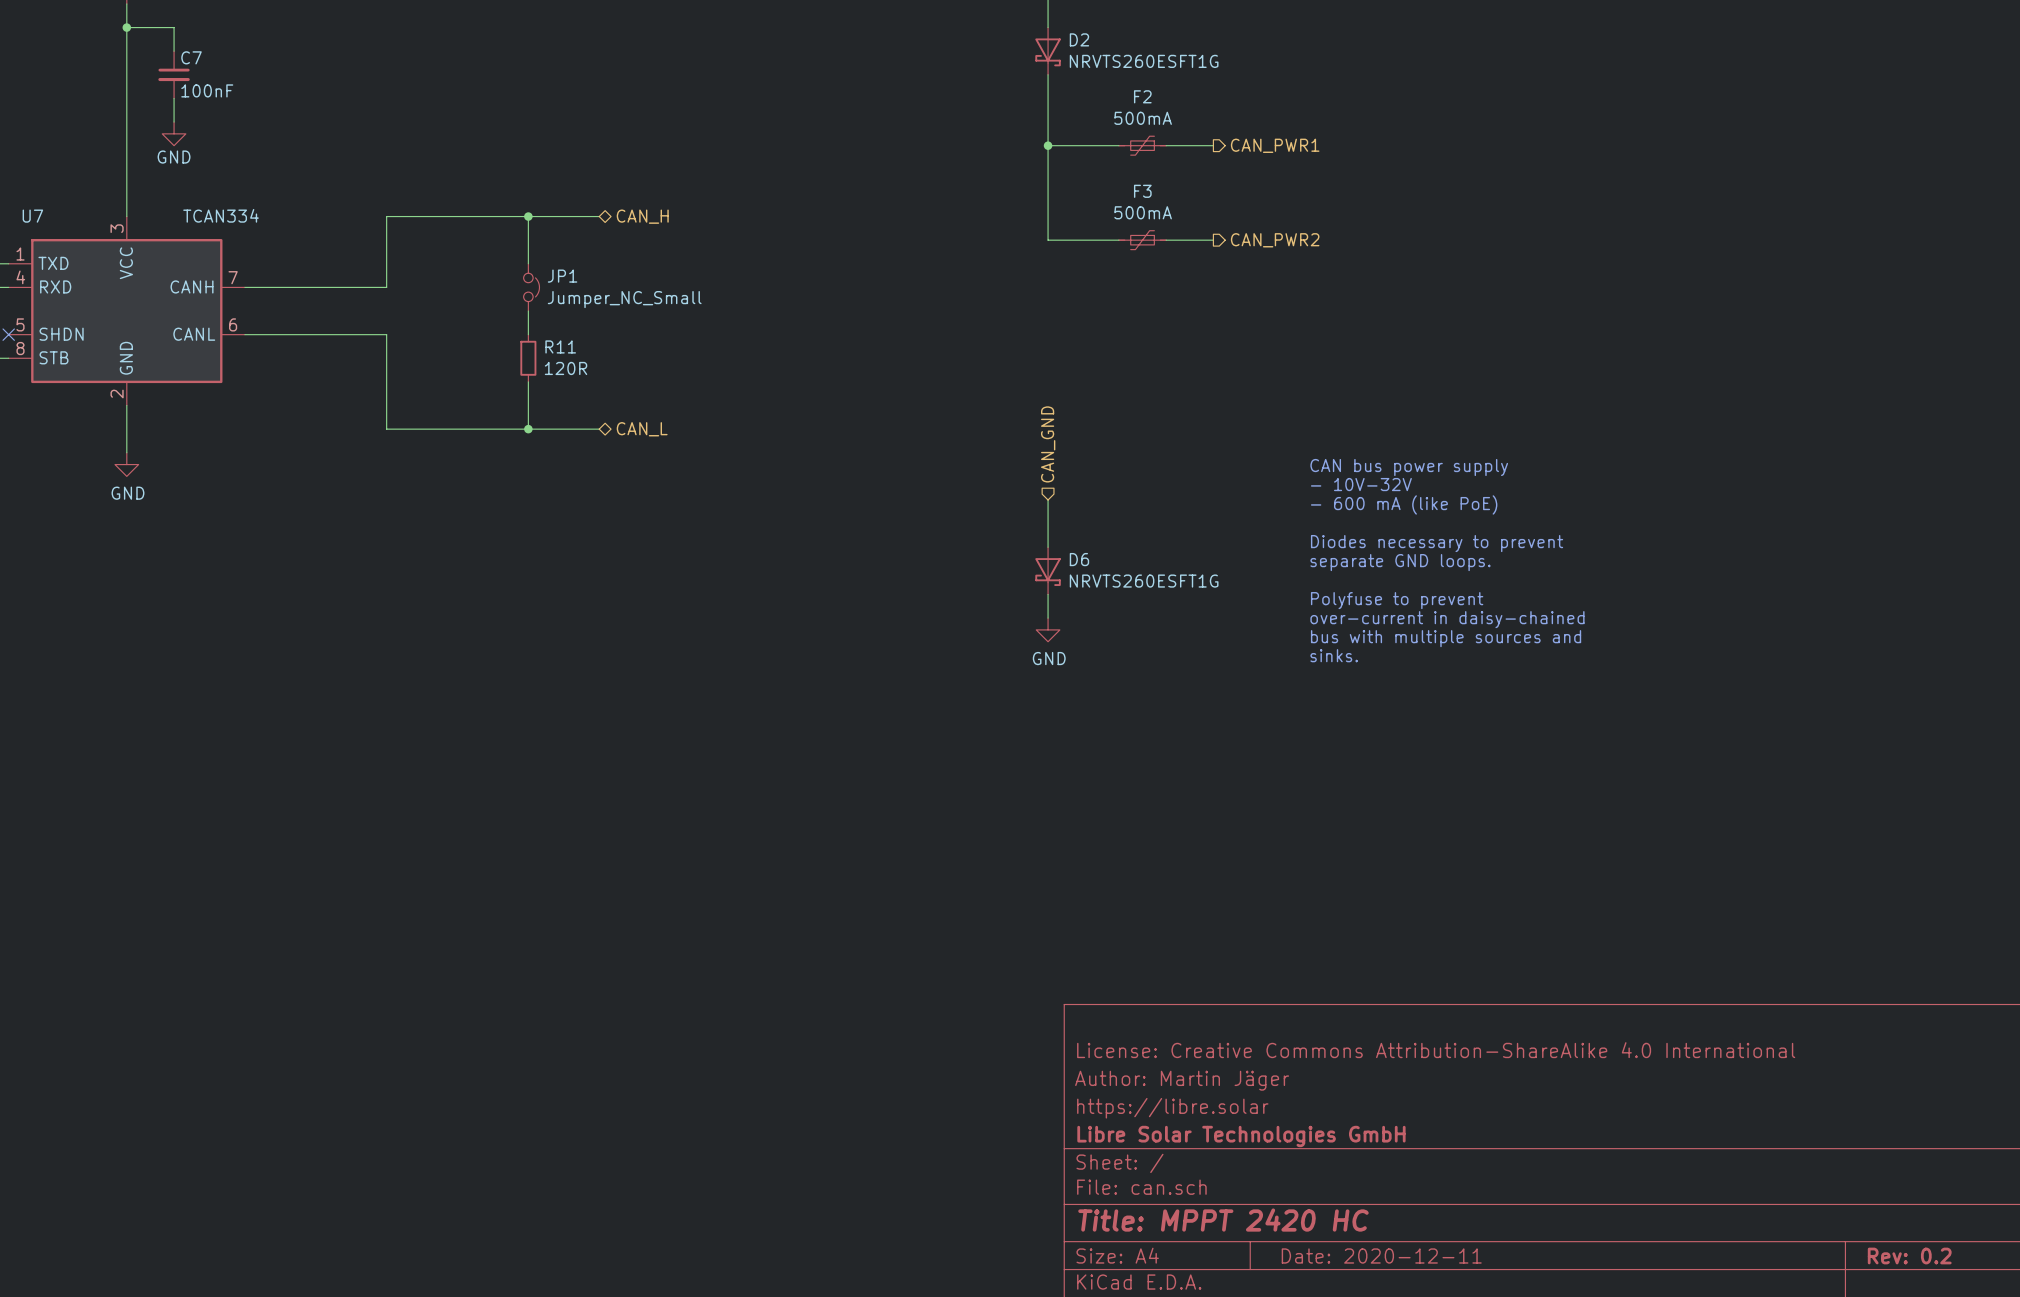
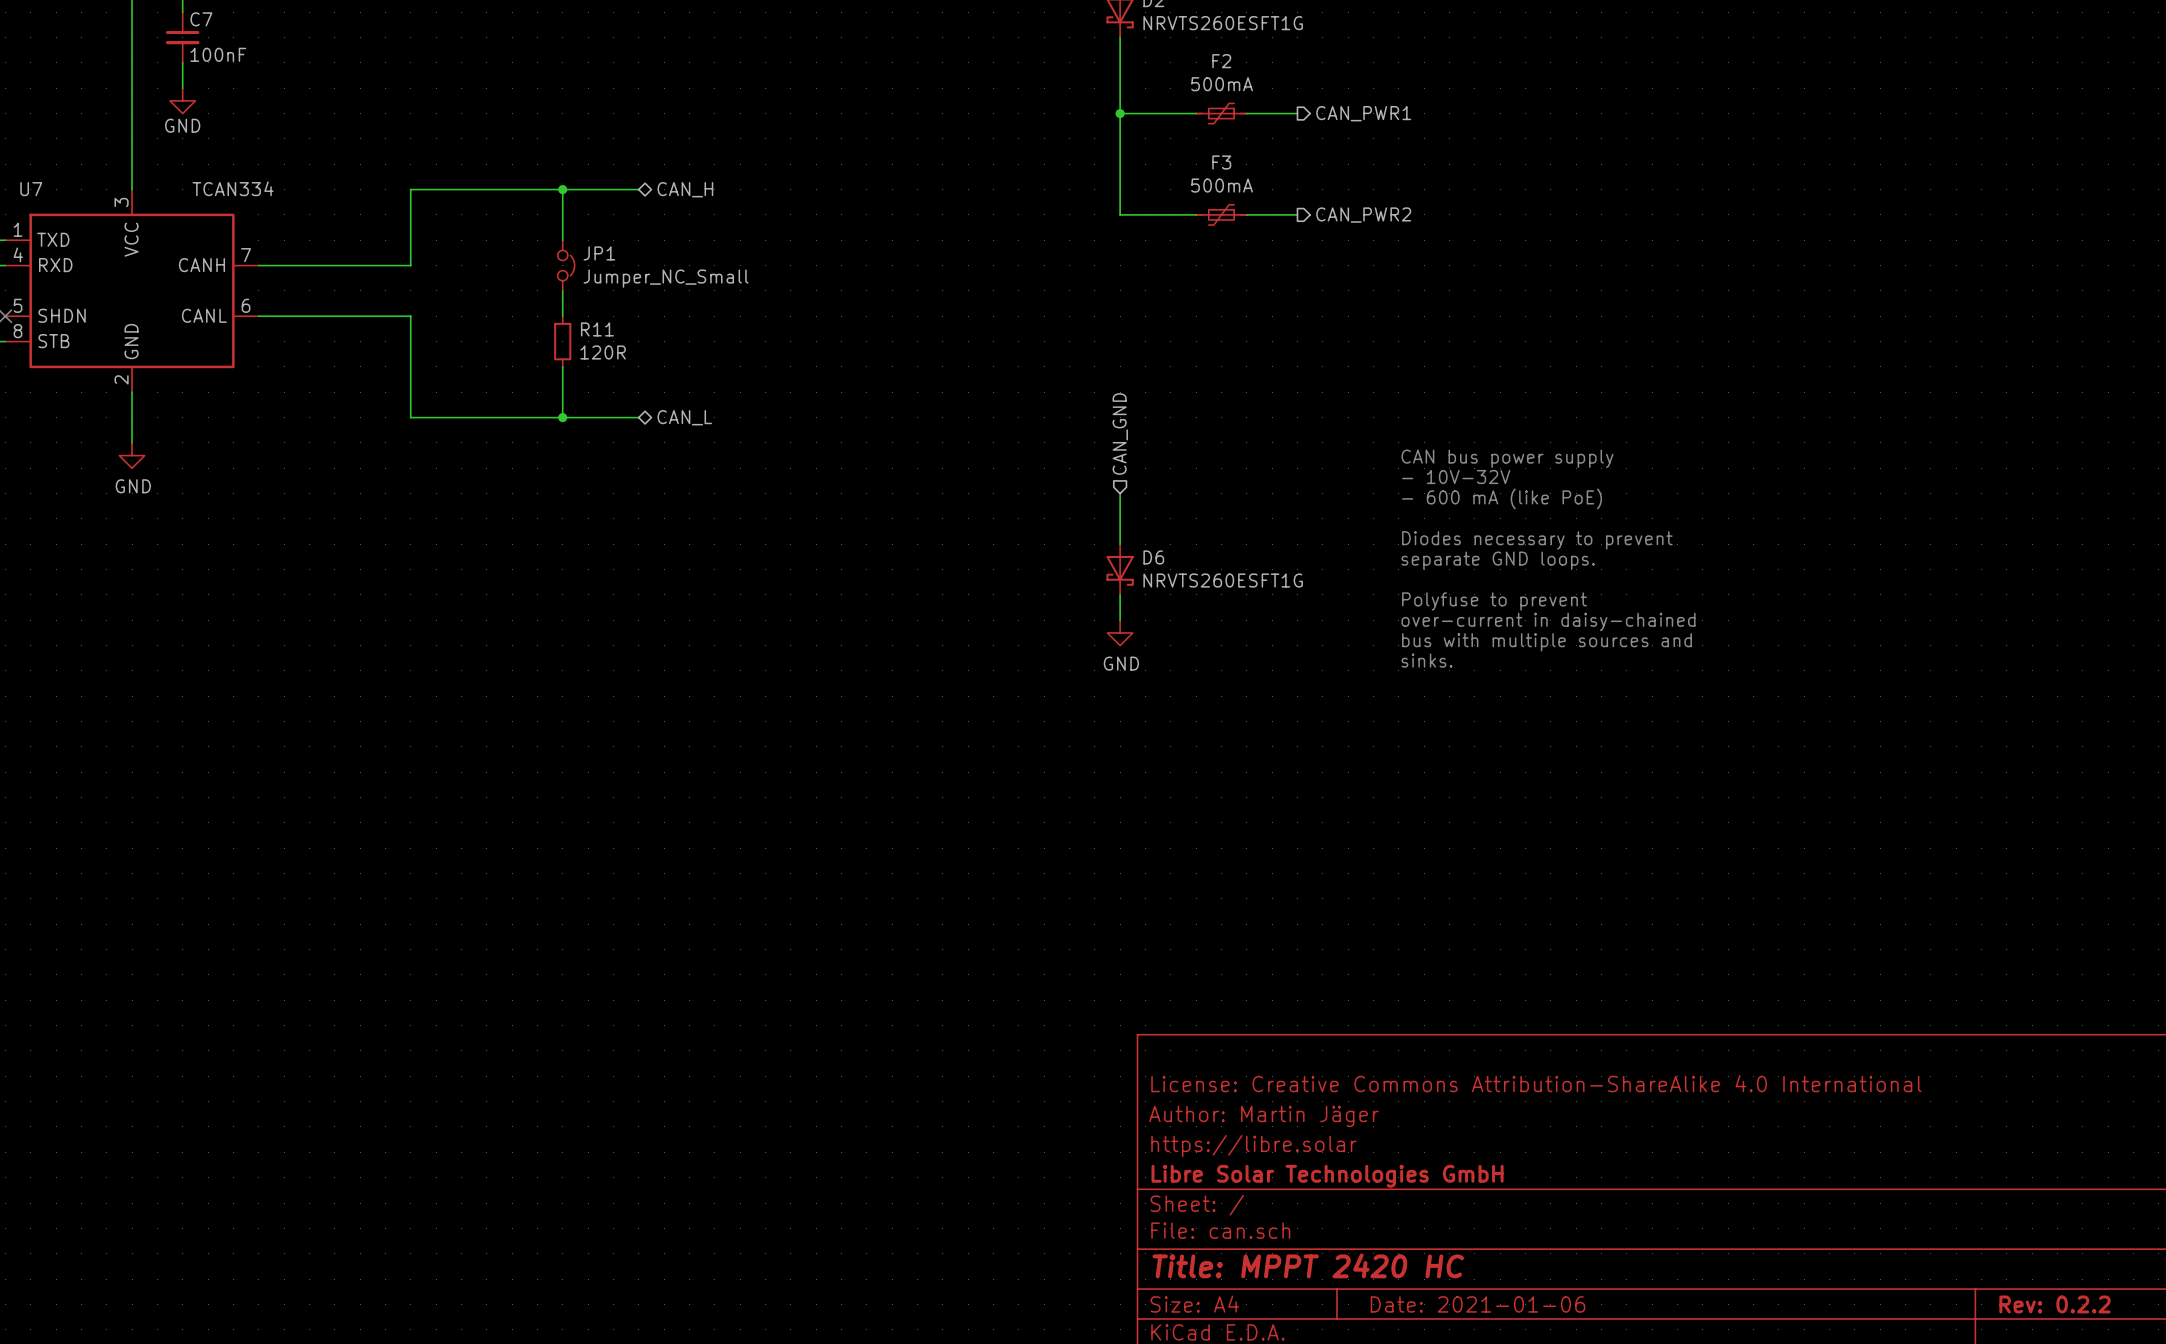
title block: Date: 2020-12-11 (1381, 1256) -> Date: 2021-01-06 (1477, 1304)
title block: Rev: 0.2 (1909, 1256) -> Rev: 0.2.2 (2055, 1304)

